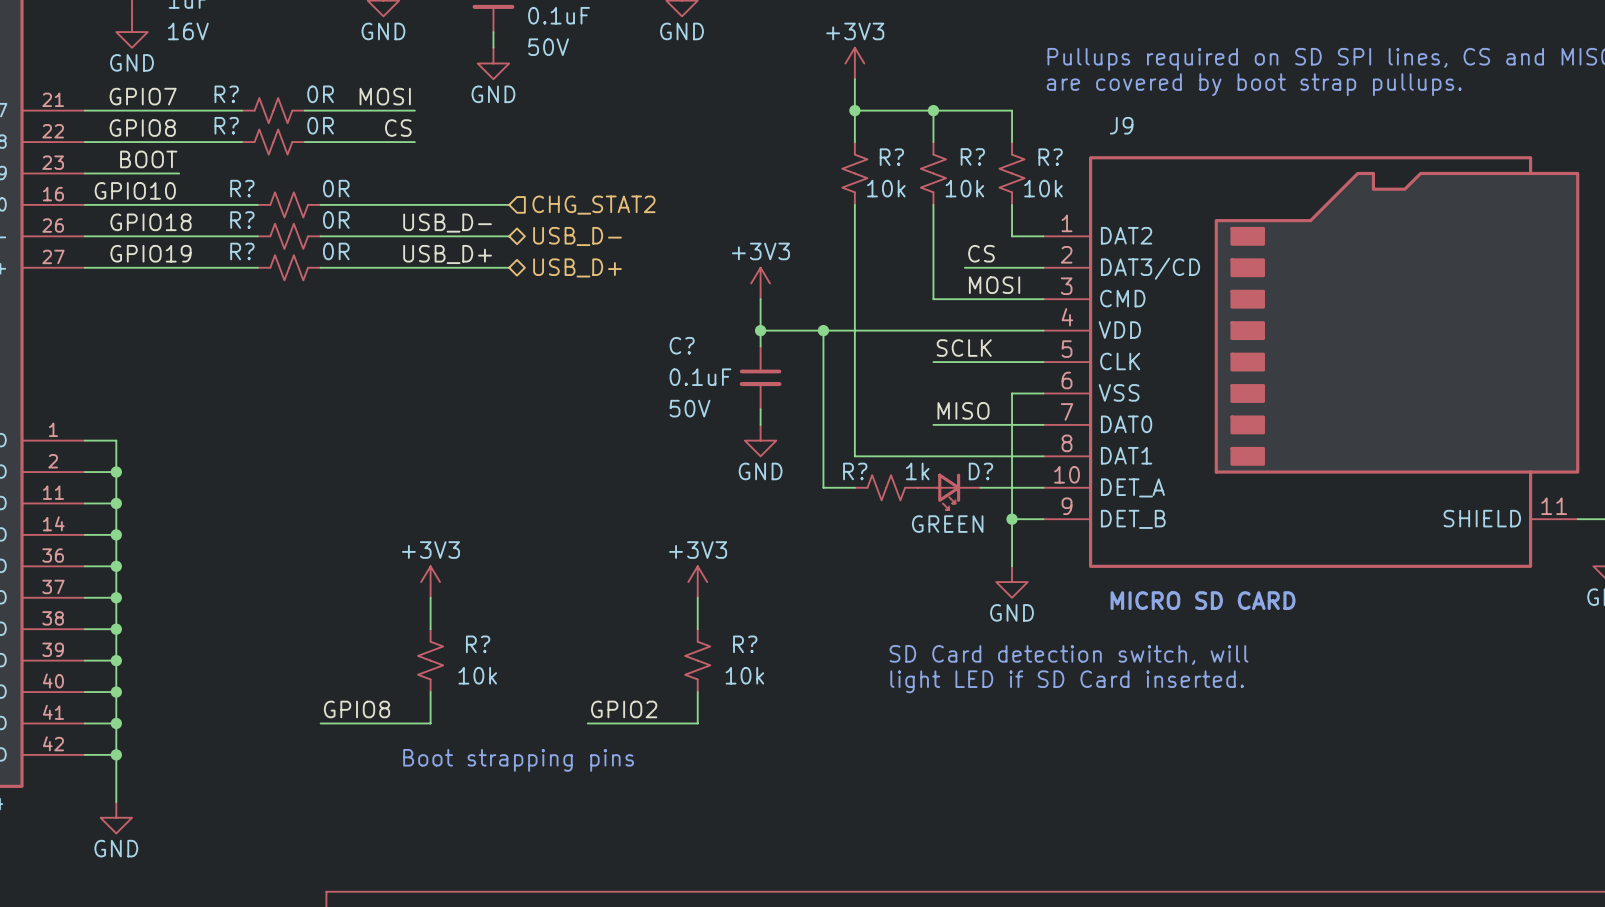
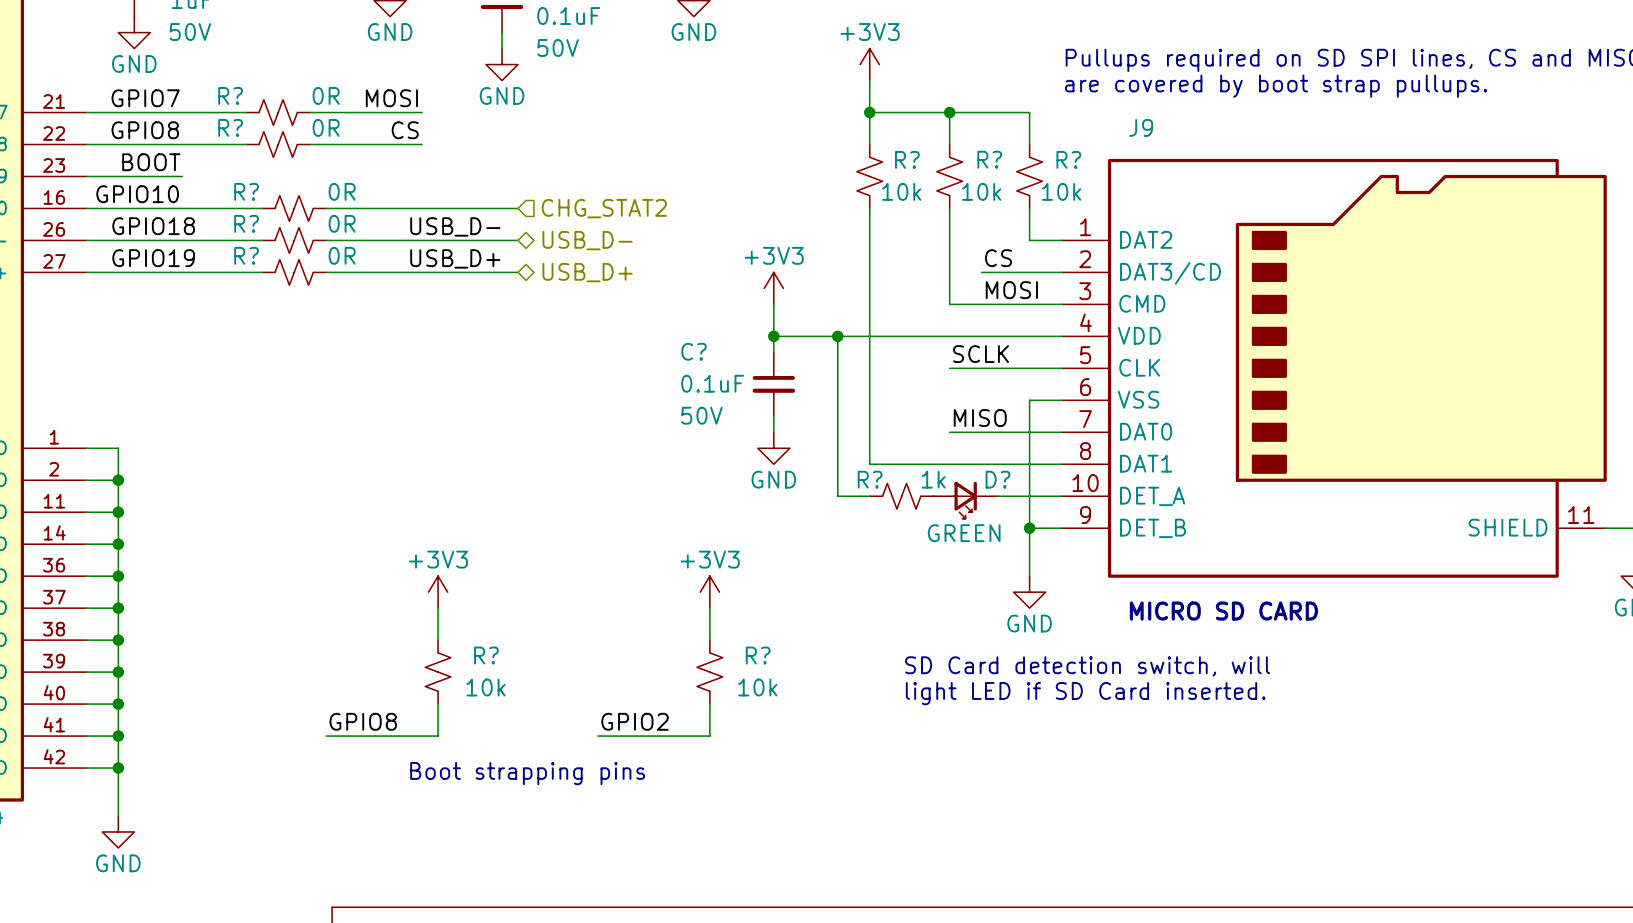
part text: 16V (188, 31) -> 50V (190, 32)

